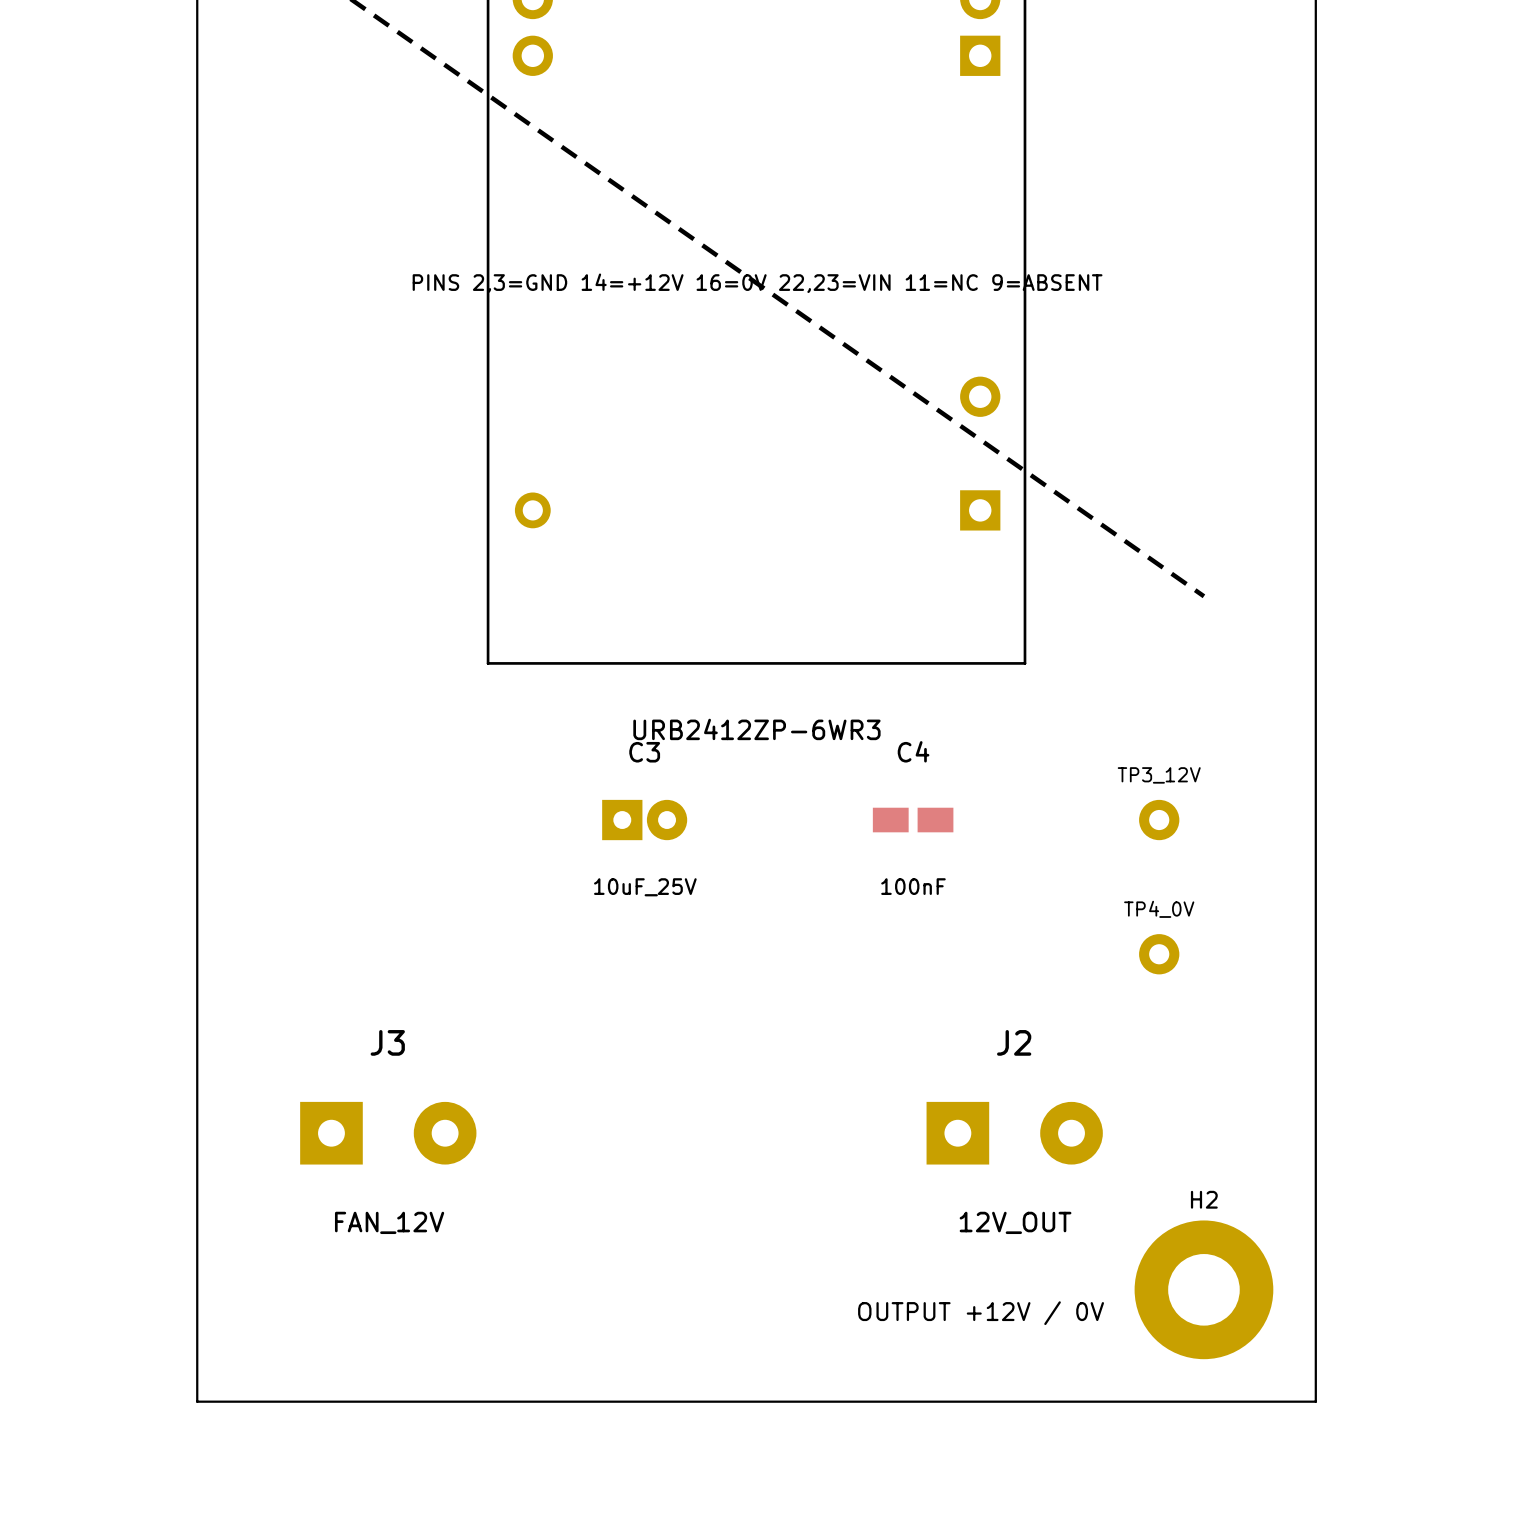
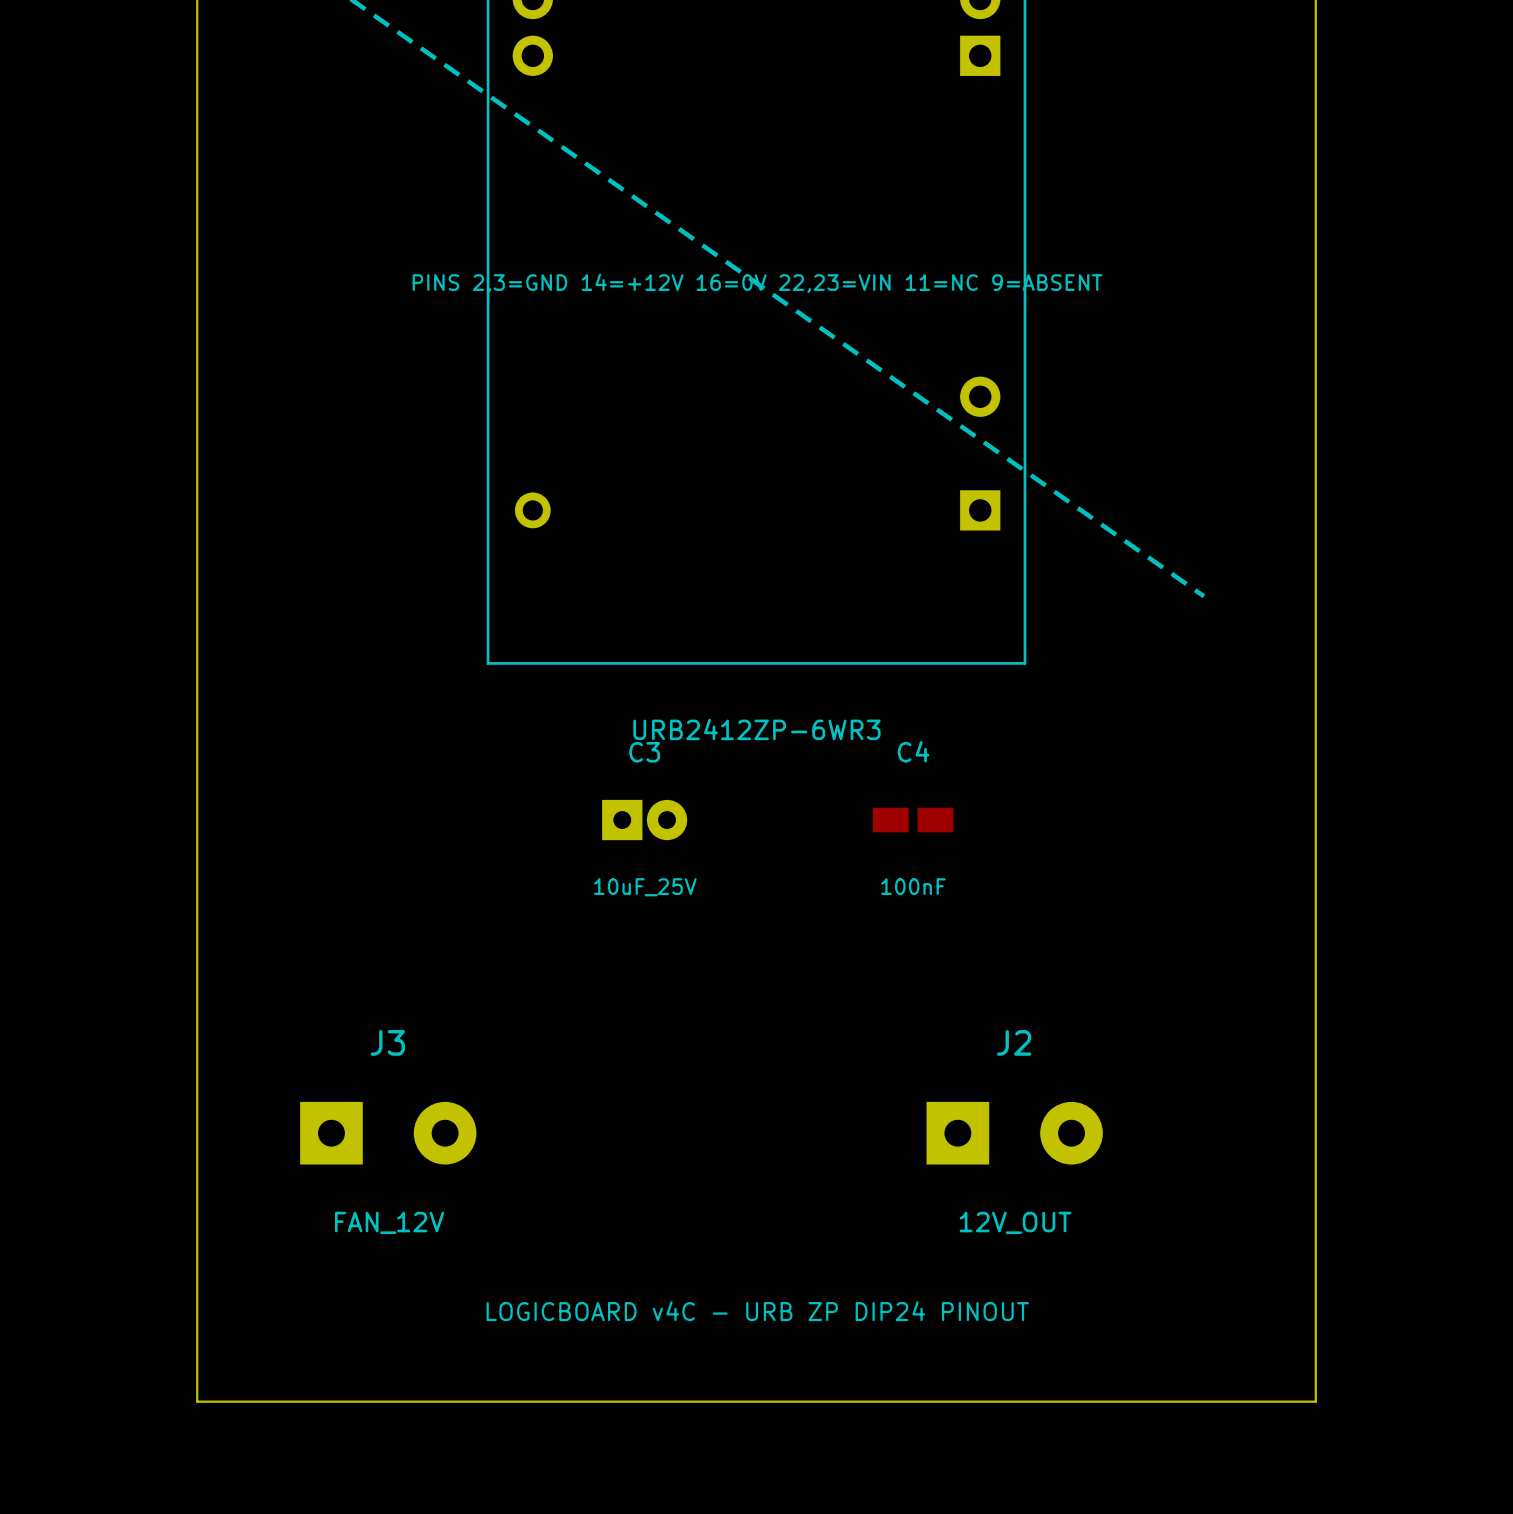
TP3_12V: (1159, 820) -> none
TP4_0V: (1159, 954) -> none
H2: (1203, 1289) -> none
text: none -> LOGICBOARD v4C - URB ZP DIP24 PINOUT (757, 1311)
text: OUTPUT +12V / 0V (981, 1313) -> none

